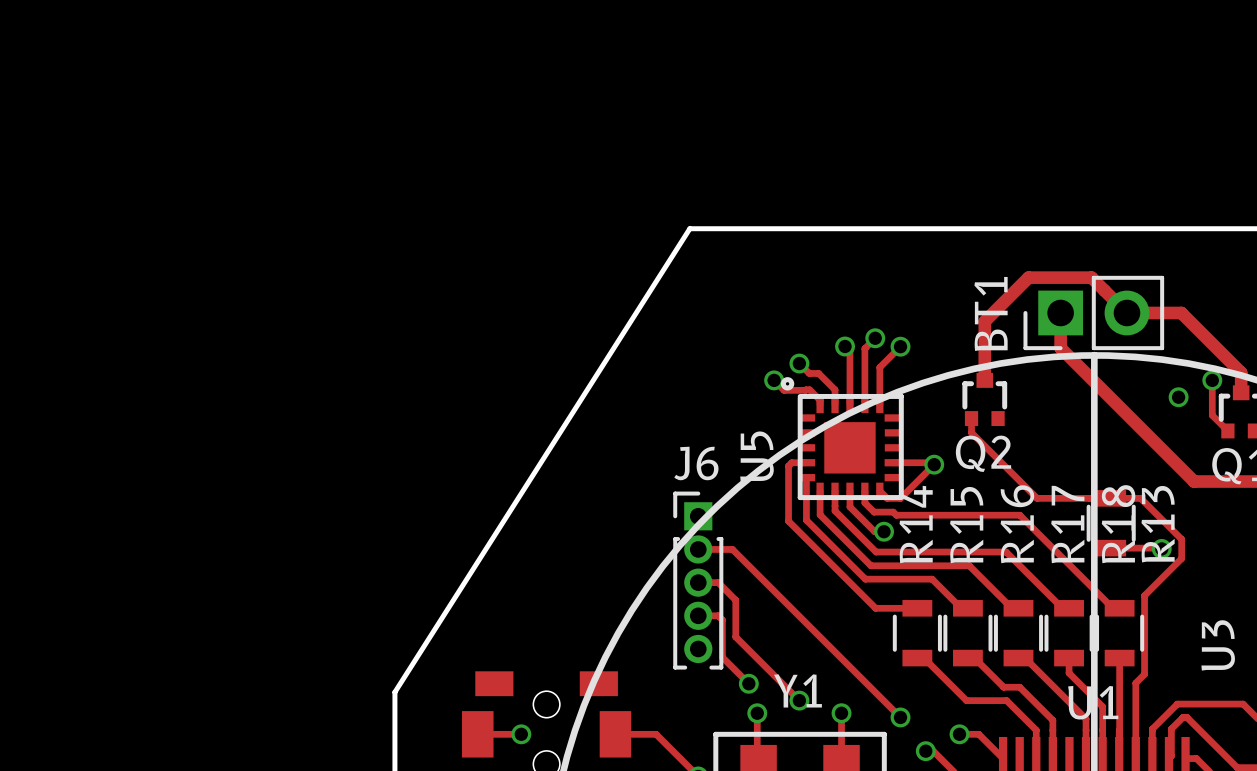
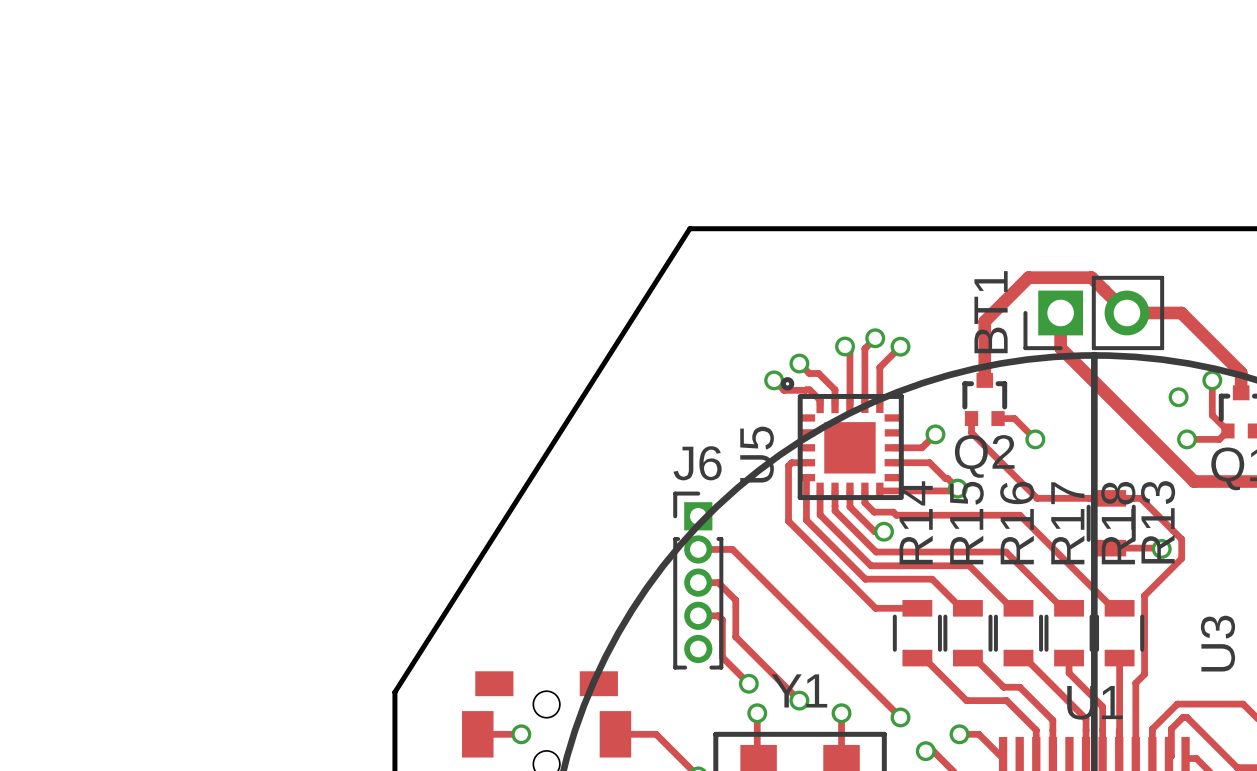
track: none -> (998, 418) (1014, 418) (1035, 439)
track: none -> (1227, 430) (1219, 439) (1187, 439)
track: none -> (935, 434) (922, 447) (893, 447)
via: none -> (935, 434)
via: none -> (1035, 439)
via: none -> (1187, 439)
track: (929, 462) (934, 464) (900, 498) (887, 498) (879, 490) -> (929, 462) (957, 488) (955, 490) (879, 490)
via: (934, 464) -> none
via: none -> (957, 488)

